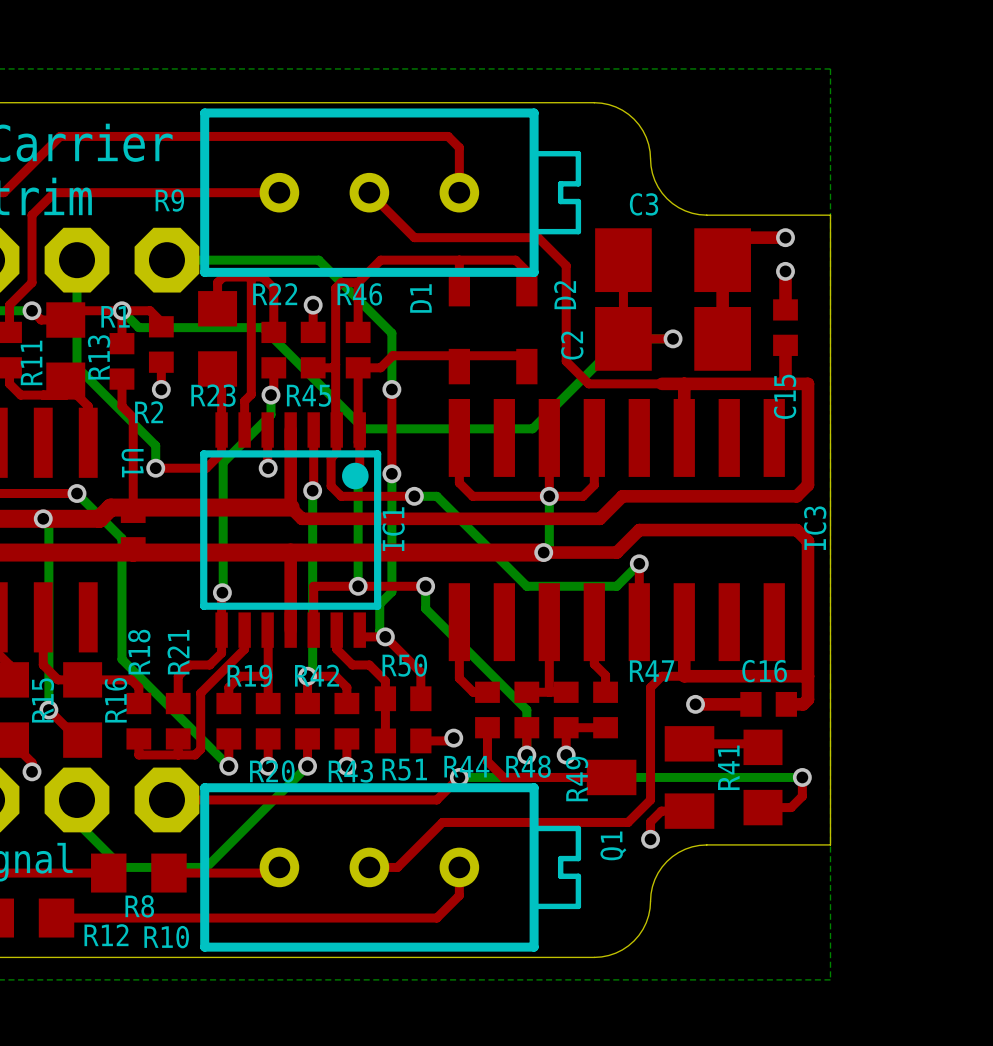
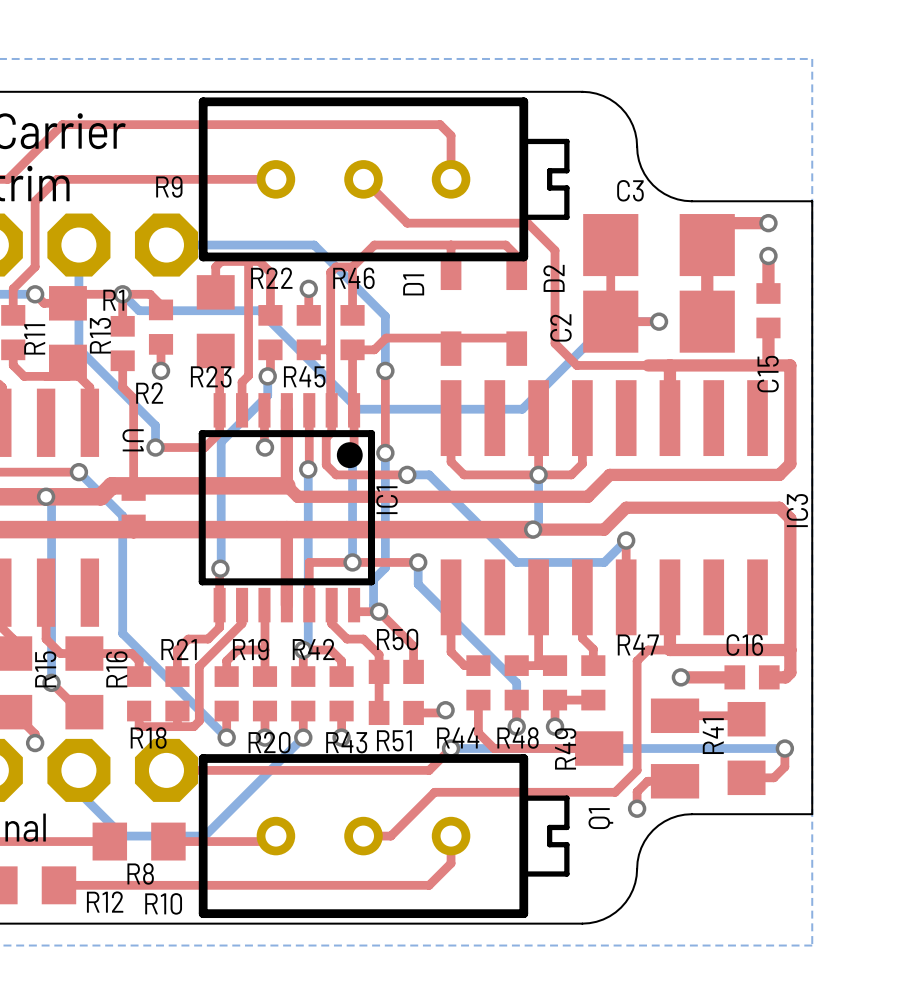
R18 name rotation: 0° (139, 652) -> 90° clockwise (148, 737)
R18 name position: R18 (139, 652) -> R18 (148, 737)
R21 name rotation: 0° (178, 652) -> 90° clockwise (179, 649)

